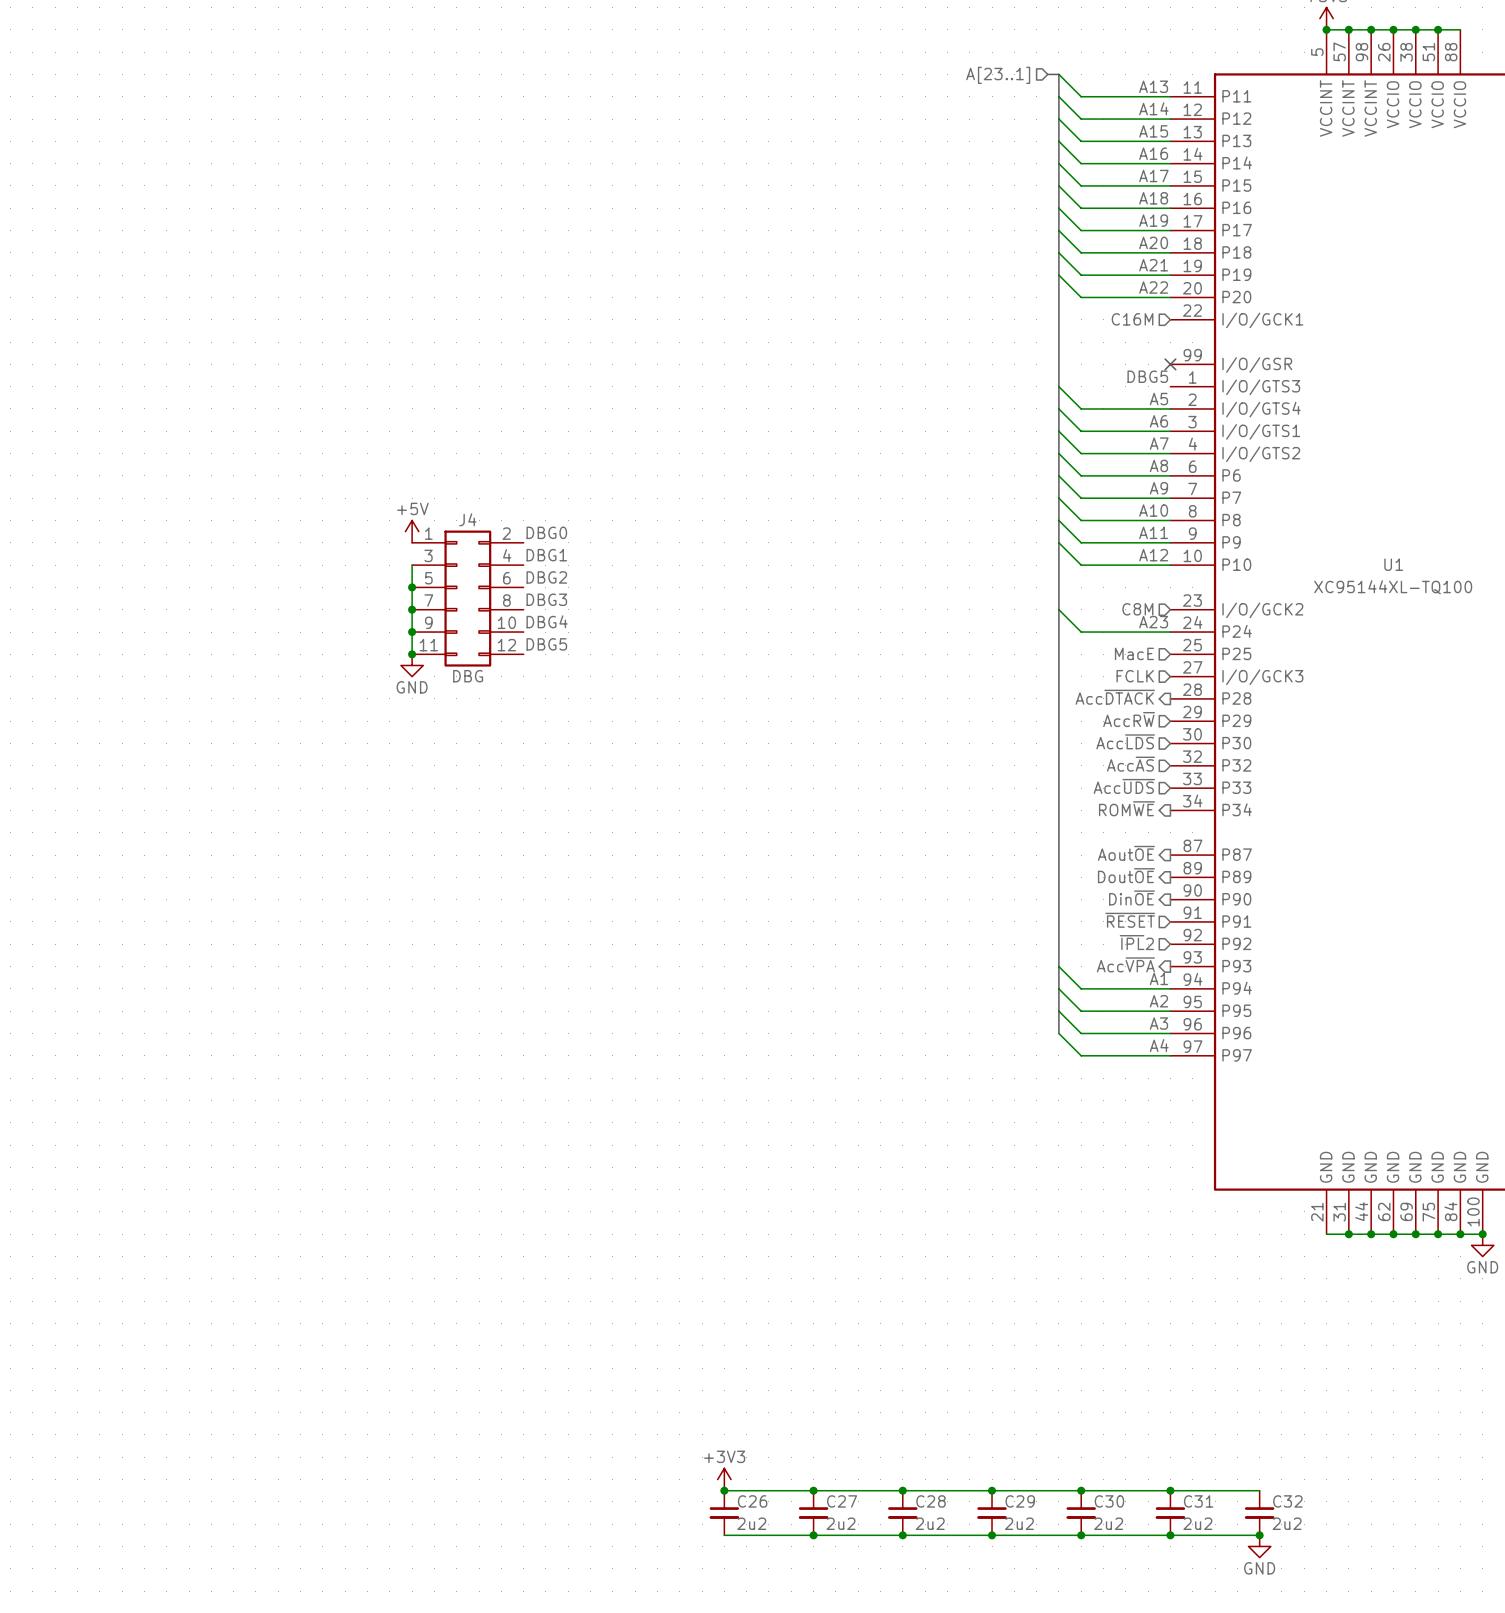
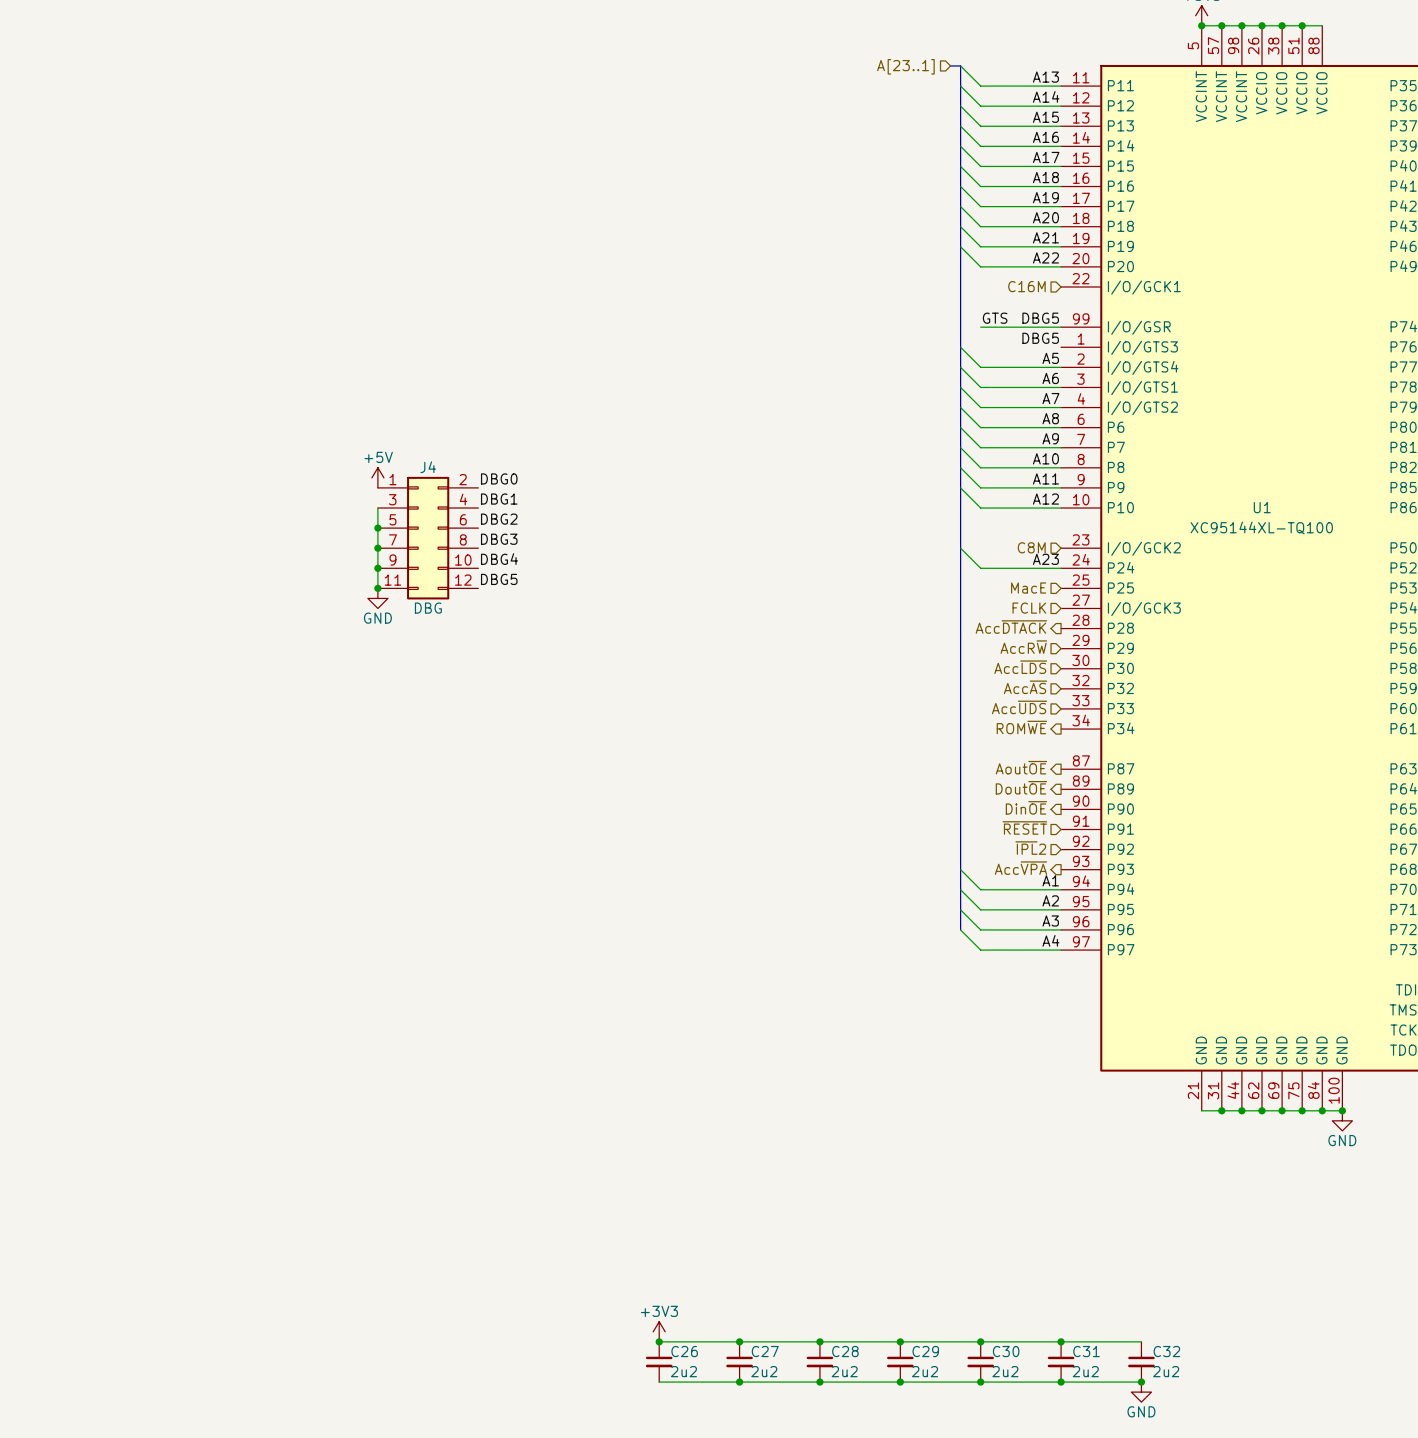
label: none -> GTS (995, 318)
label: none -> DBG5 (1040, 318)
wire: none -> (980, 327) (1061, 327)
no-connect mark: (1170, 364) -> none

